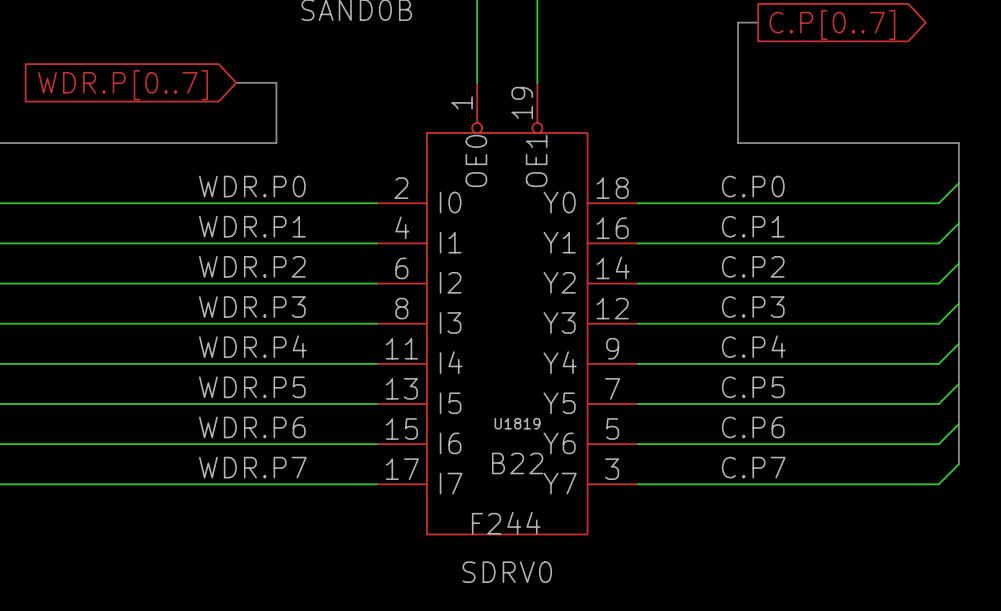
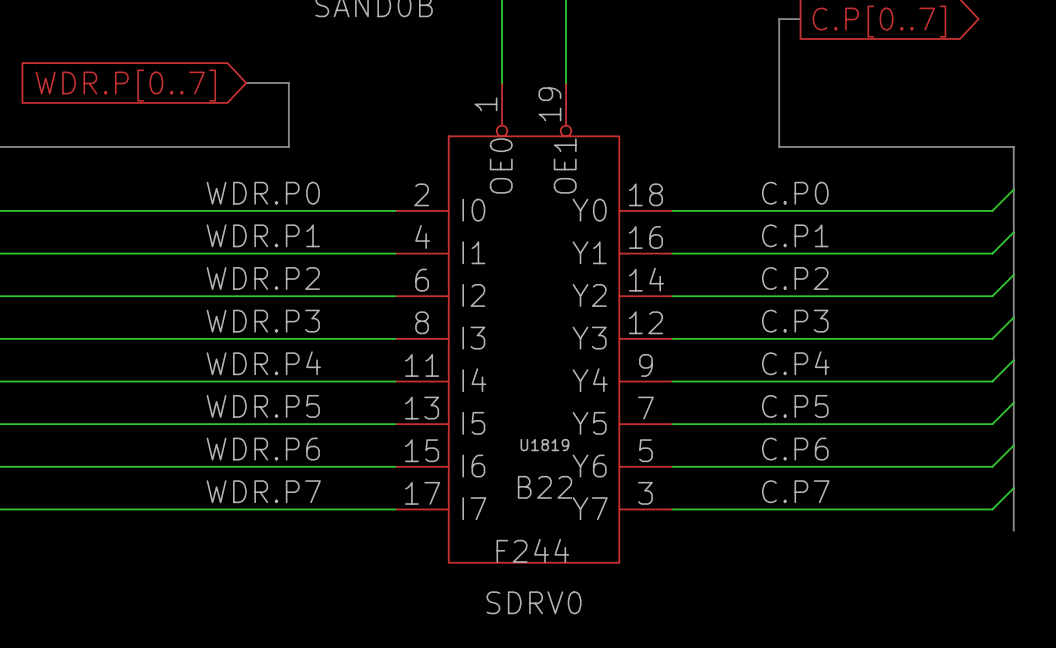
bus: none -> (1013, 488) (1013, 530)

